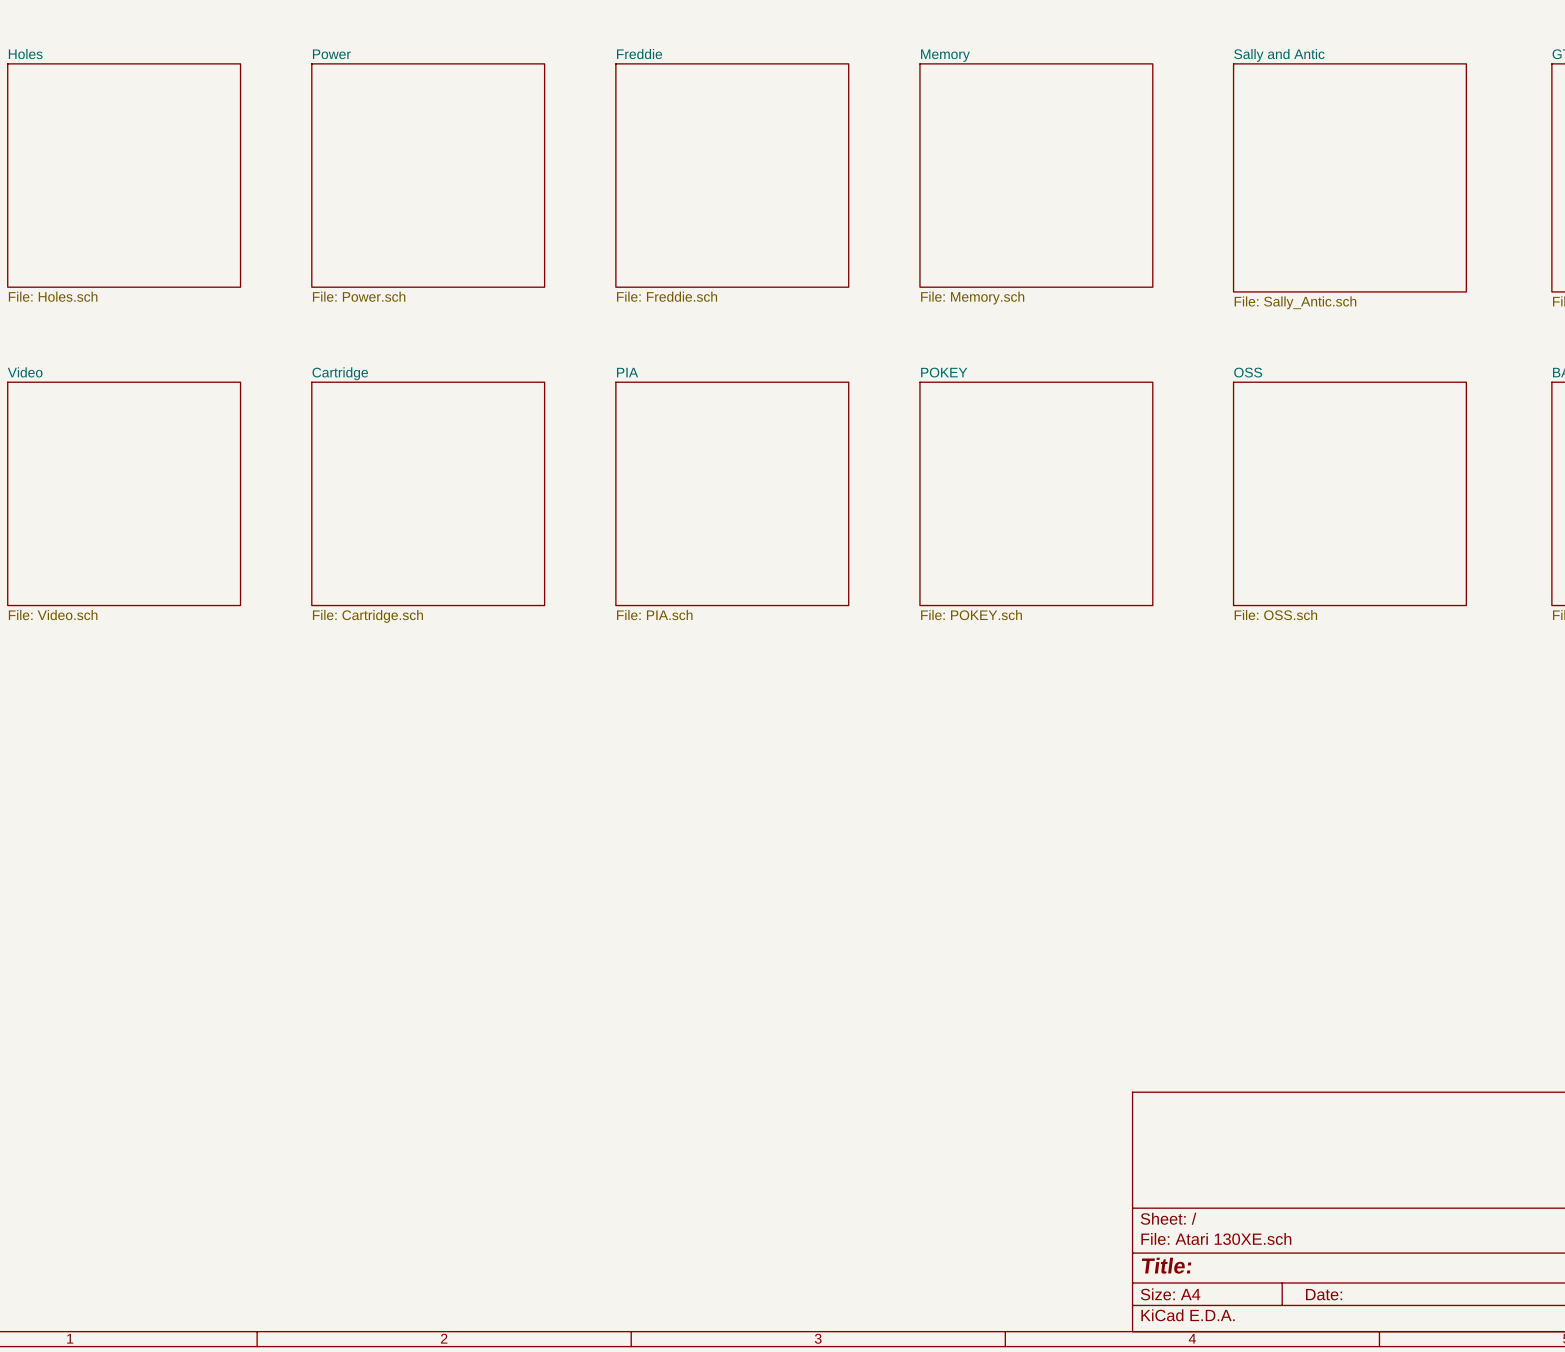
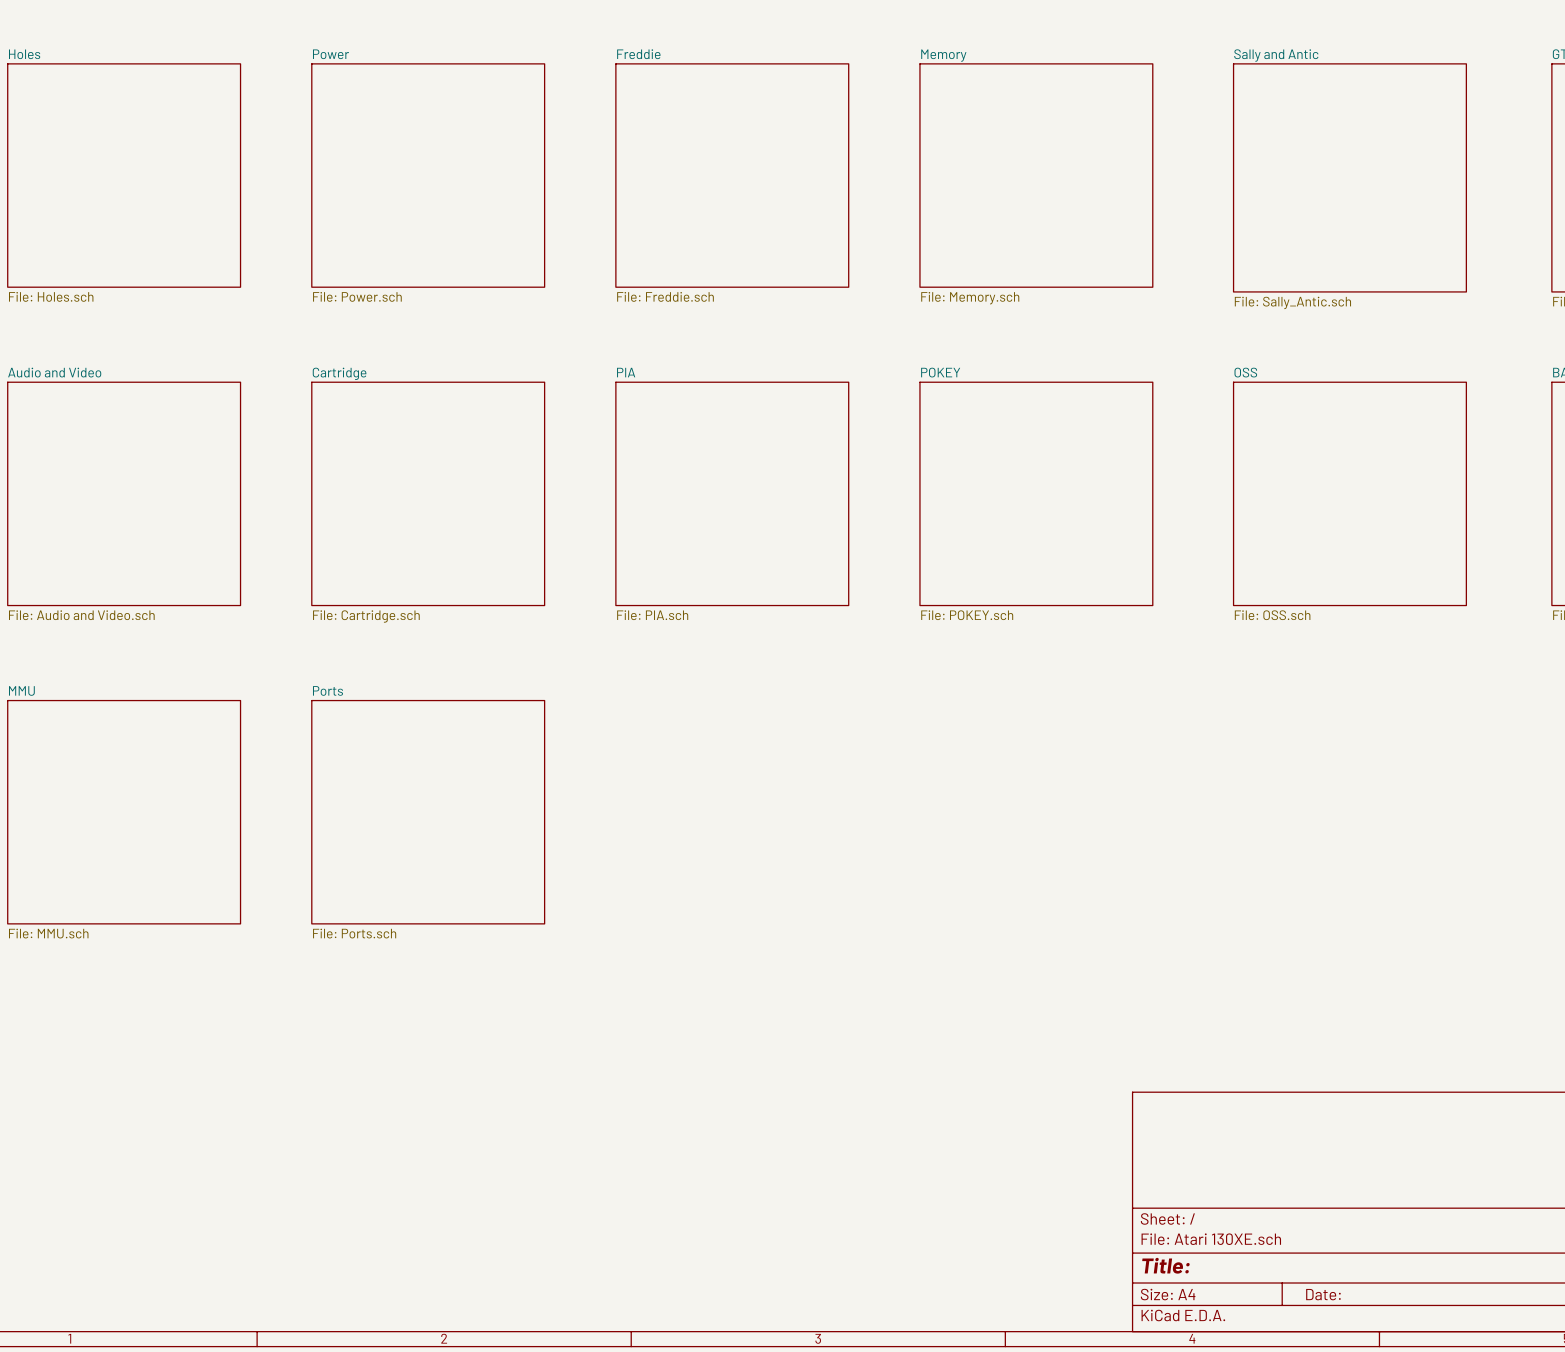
sheet Video name: Video (25, 372) -> Audio and Video (54, 372)
sheet Video value: File: Video.sch (53, 615) -> File: Audio and Video.sch (81, 615)
sheet MMU: none -> File: MMU.sch (124, 812)
sheet Ports: none -> File: Ports.sch (428, 812)

